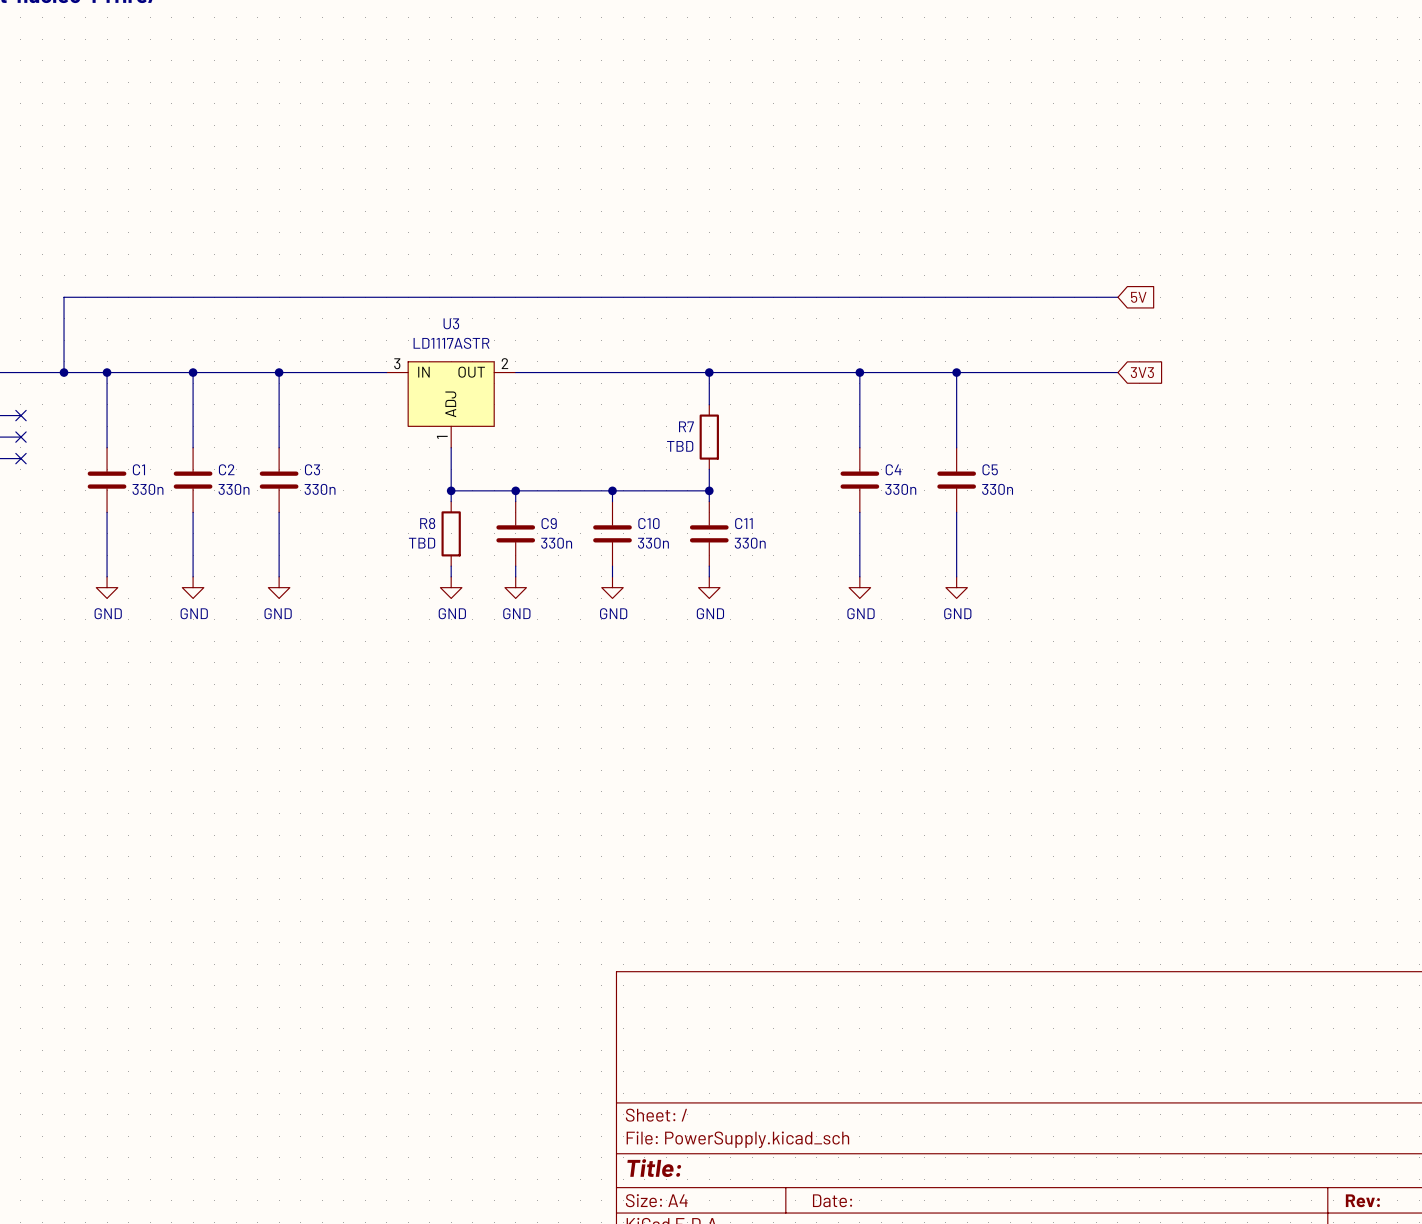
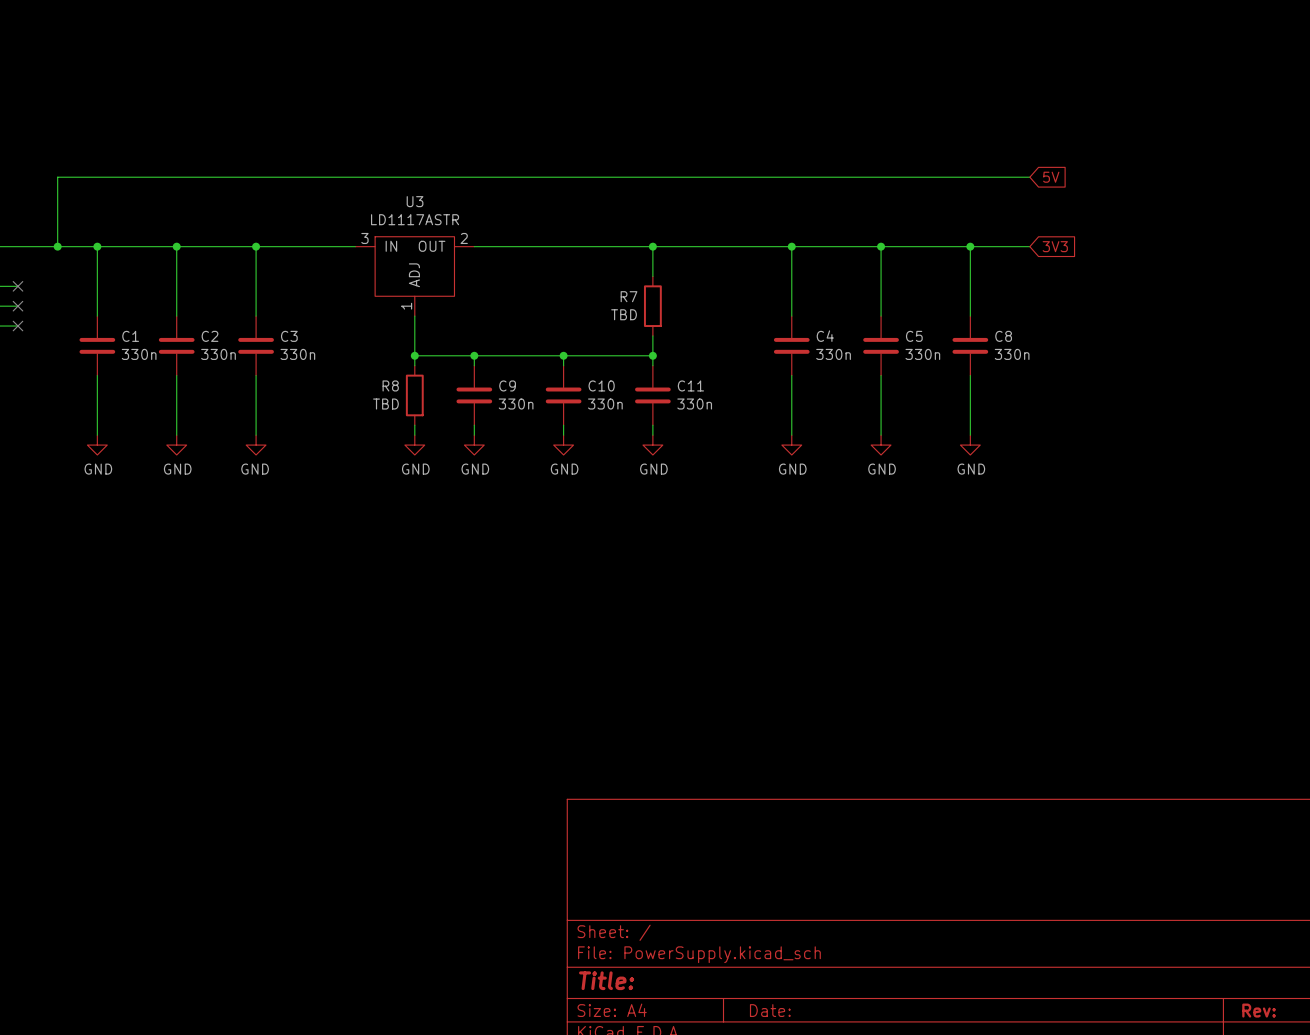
wire: none -> (970, 246) (970, 316)
junction: none -> (970, 246)
C8: none -> 330n (970, 345)
wire: none -> (970, 375) (970, 435)
power symbol: none -> GND (970, 445)

